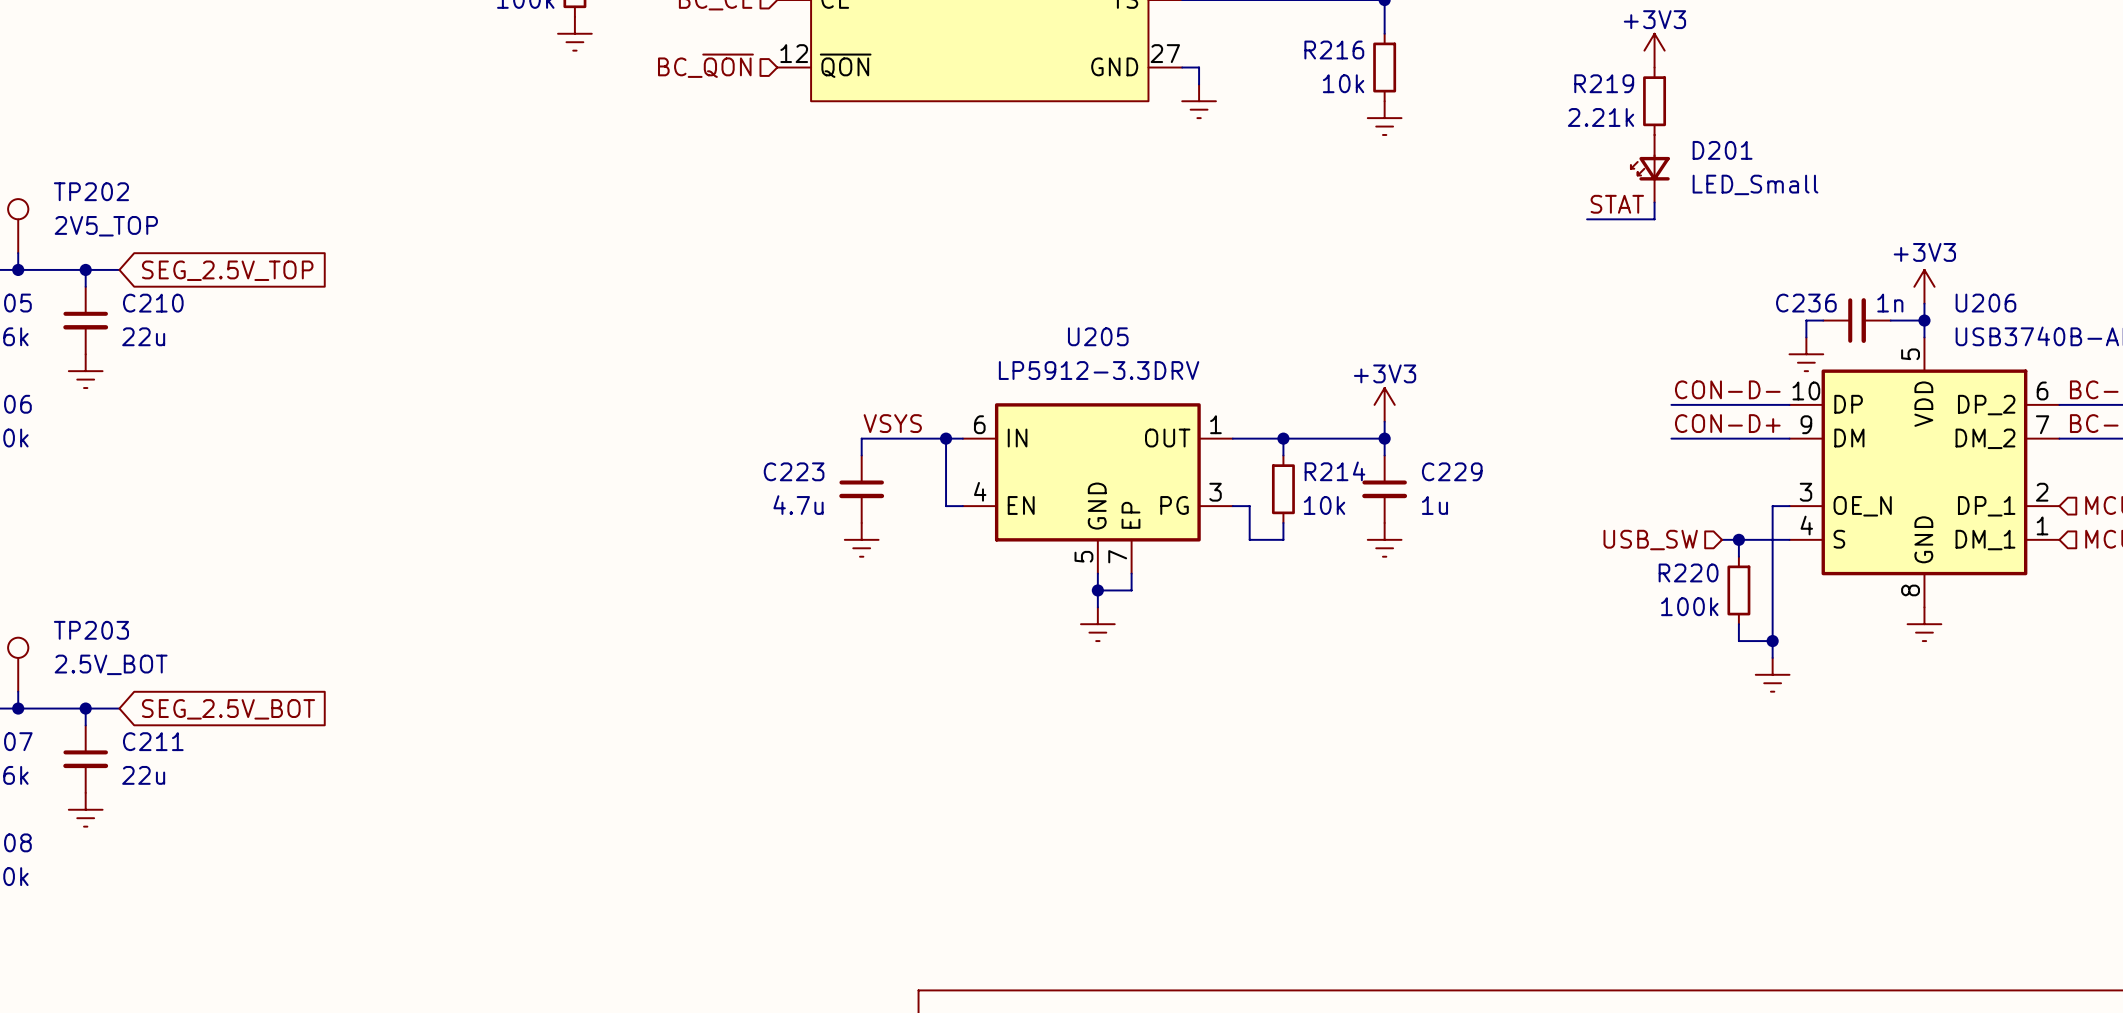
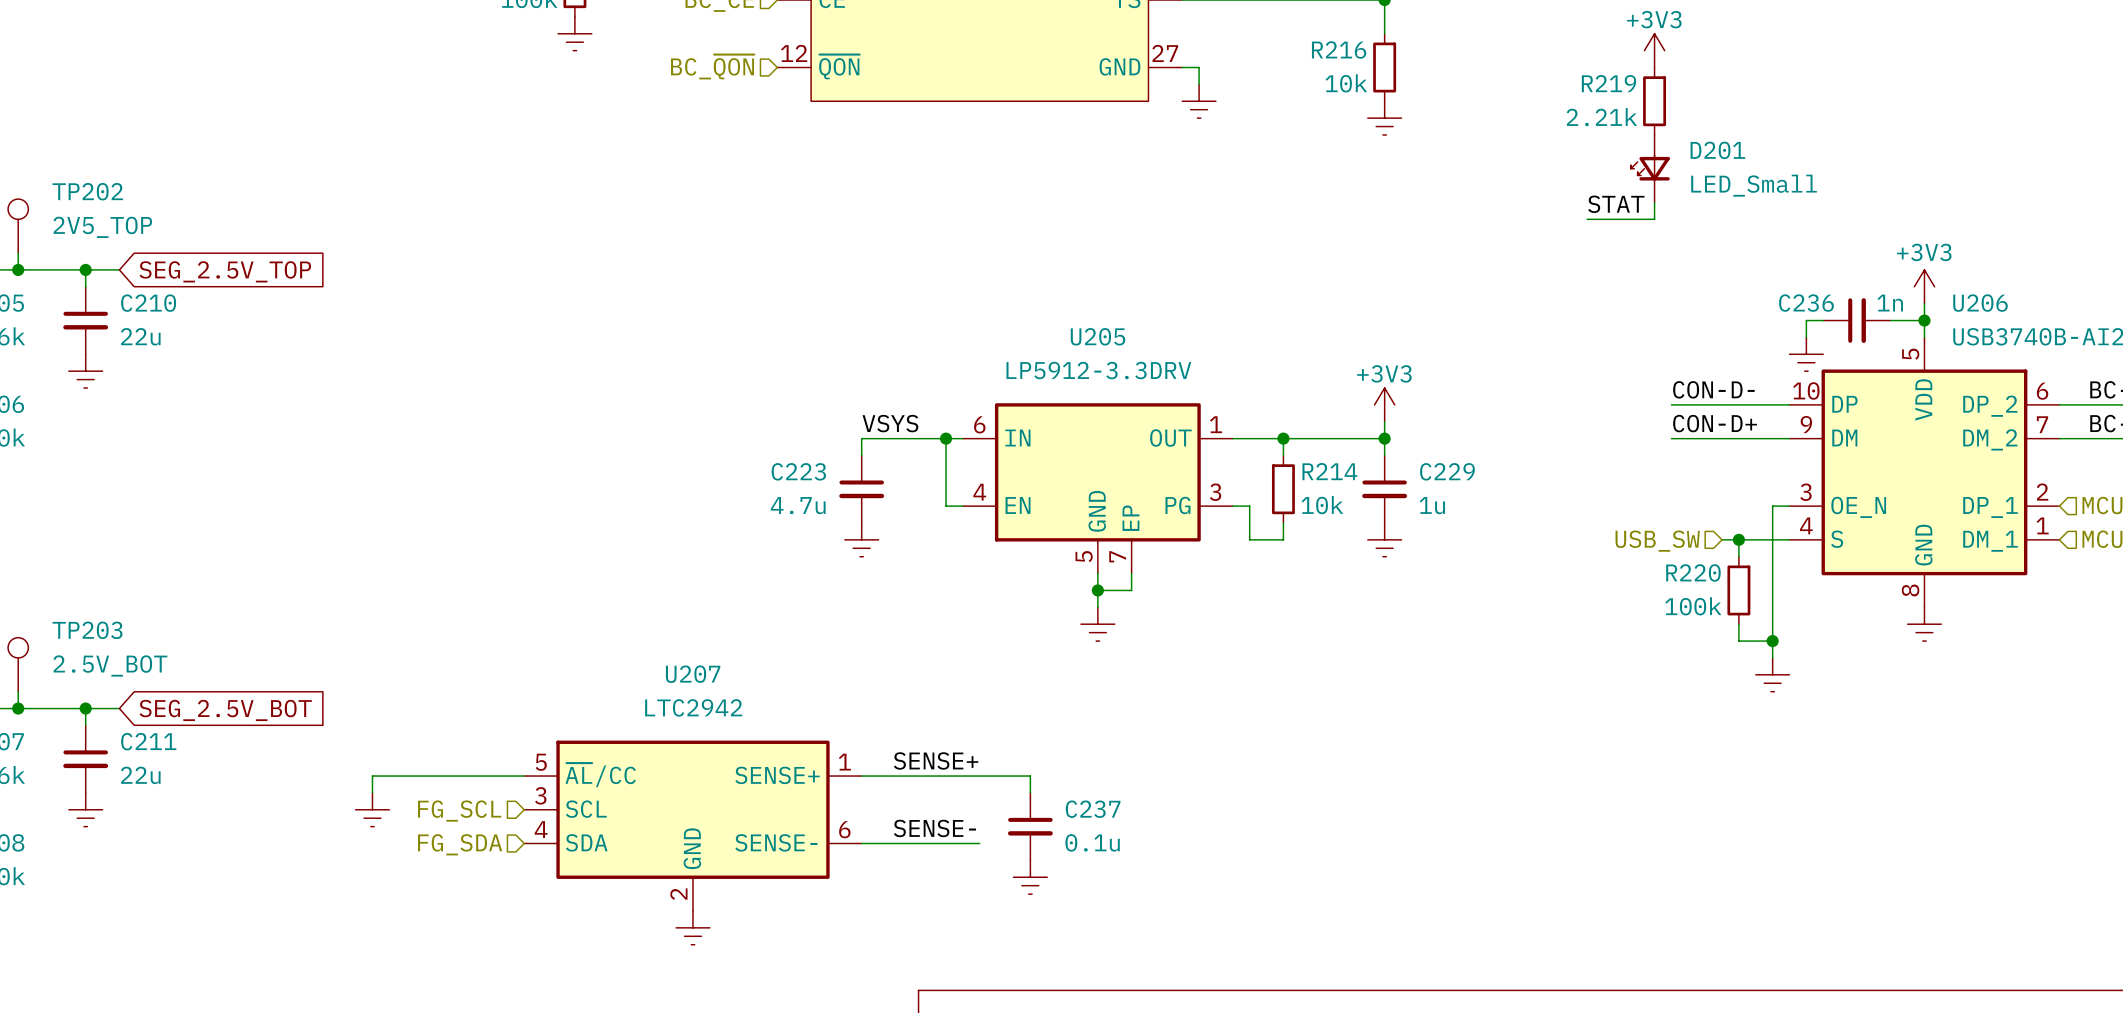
label: none -> SENSE+ (936, 760)
wire: none -> (524, 776) (372, 776) (372, 792)
wire: none -> (861, 776) (1030, 776) (1030, 792)
power symbol: none -> (372, 809)
hierarchical label: none -> FG_SCL (459, 811)
U207: none -> LTC2942 (692, 825)
C237: none -> 0.1u (1030, 826)
label: none -> SENSE- (934, 828)
hierarchical label: none -> FG_SDA (460, 844)
wire: none -> (861, 843) (979, 843)
power symbol: none -> (1030, 877)
power symbol: none -> (692, 927)

